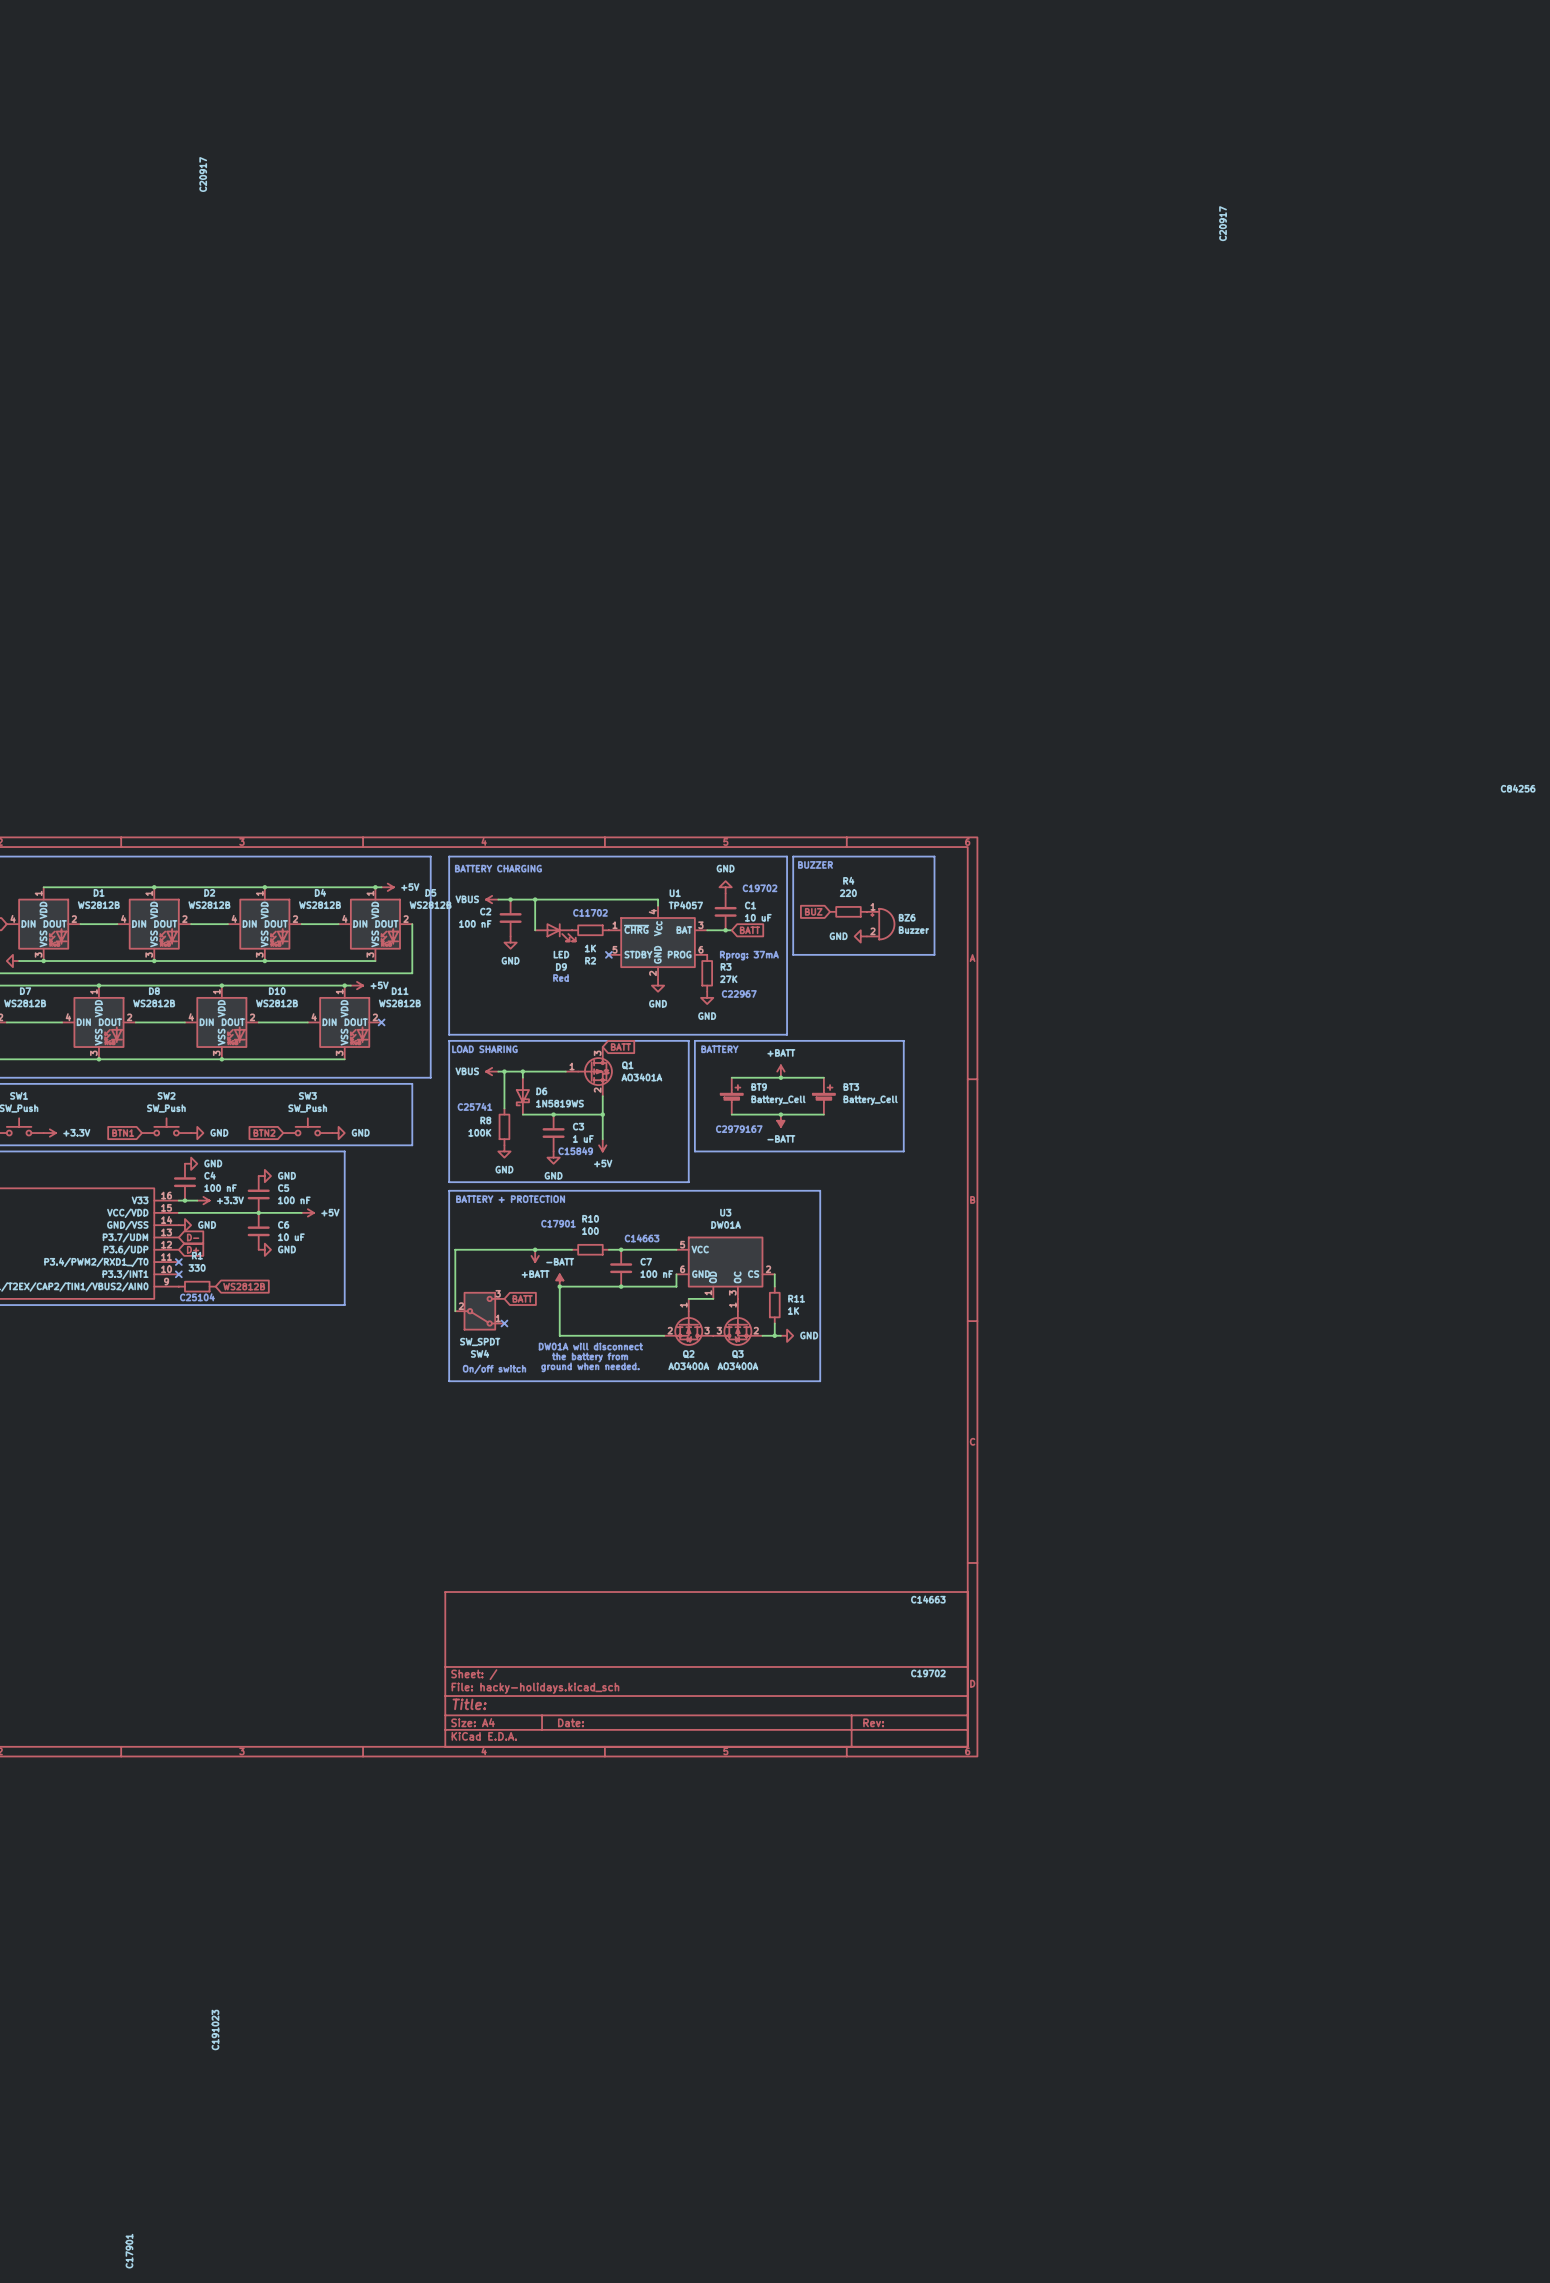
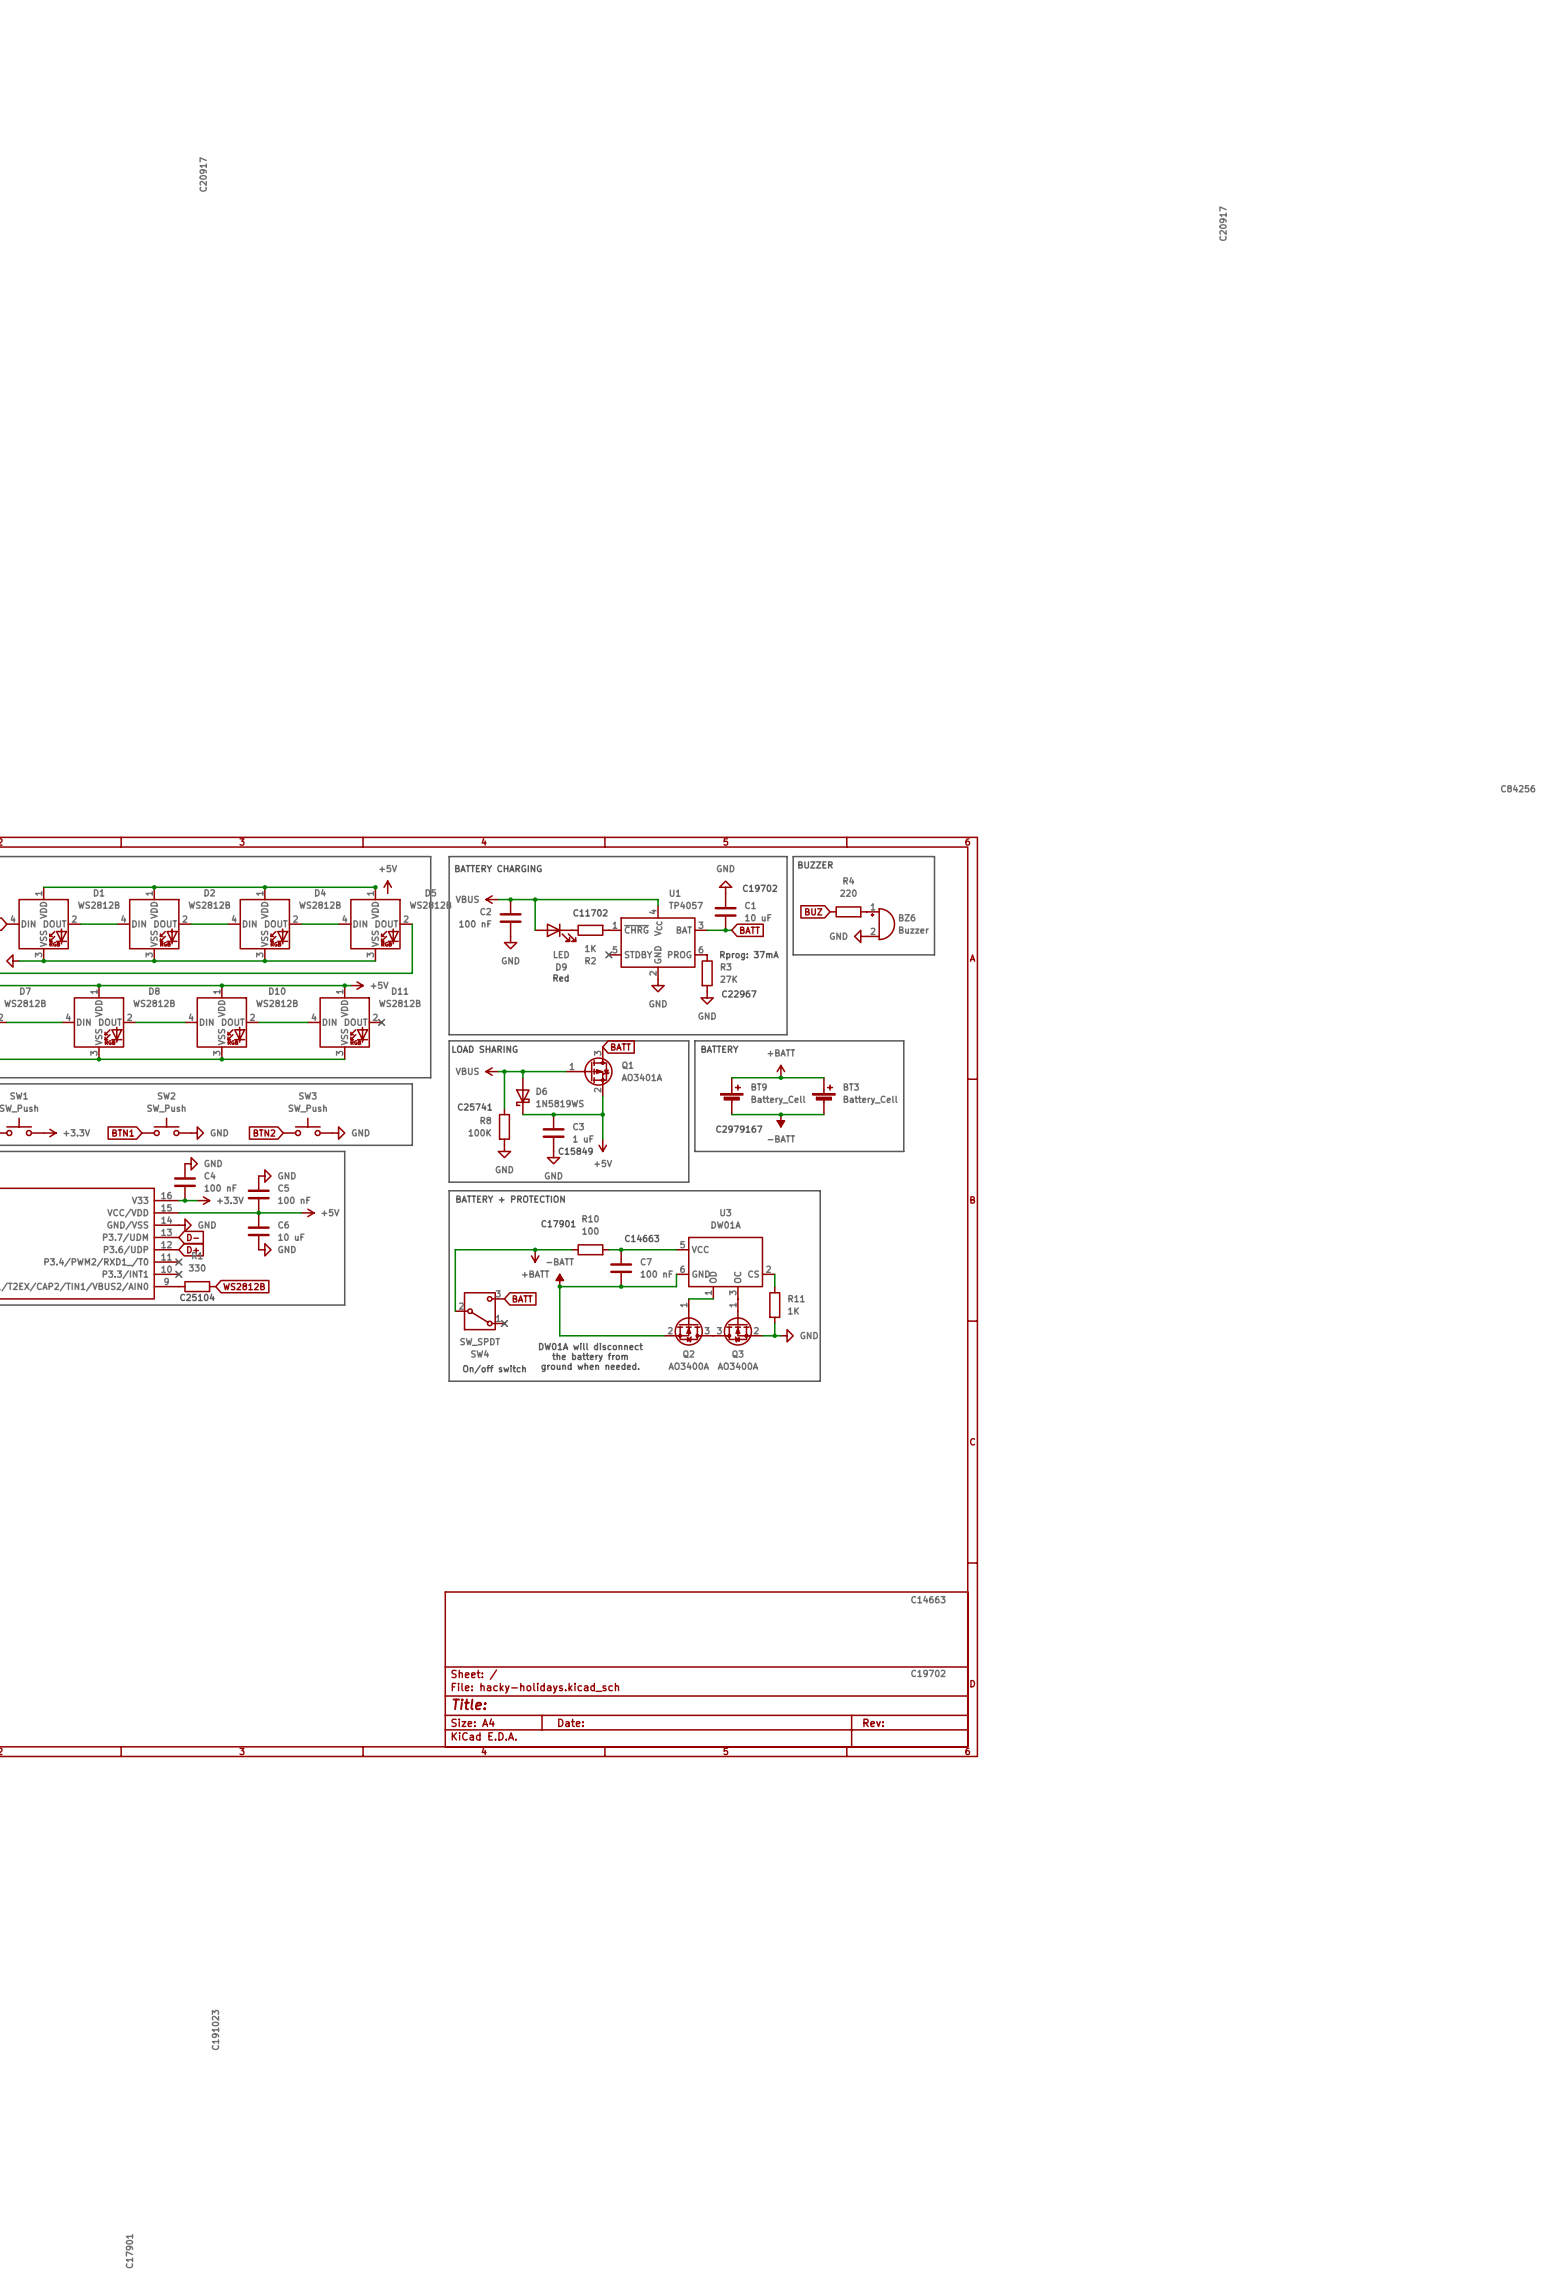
wire: (375, 887) (381, 887) -> none
power symbol rotation: 0° (387, 887) -> 90° counterclockwise (387, 887)

